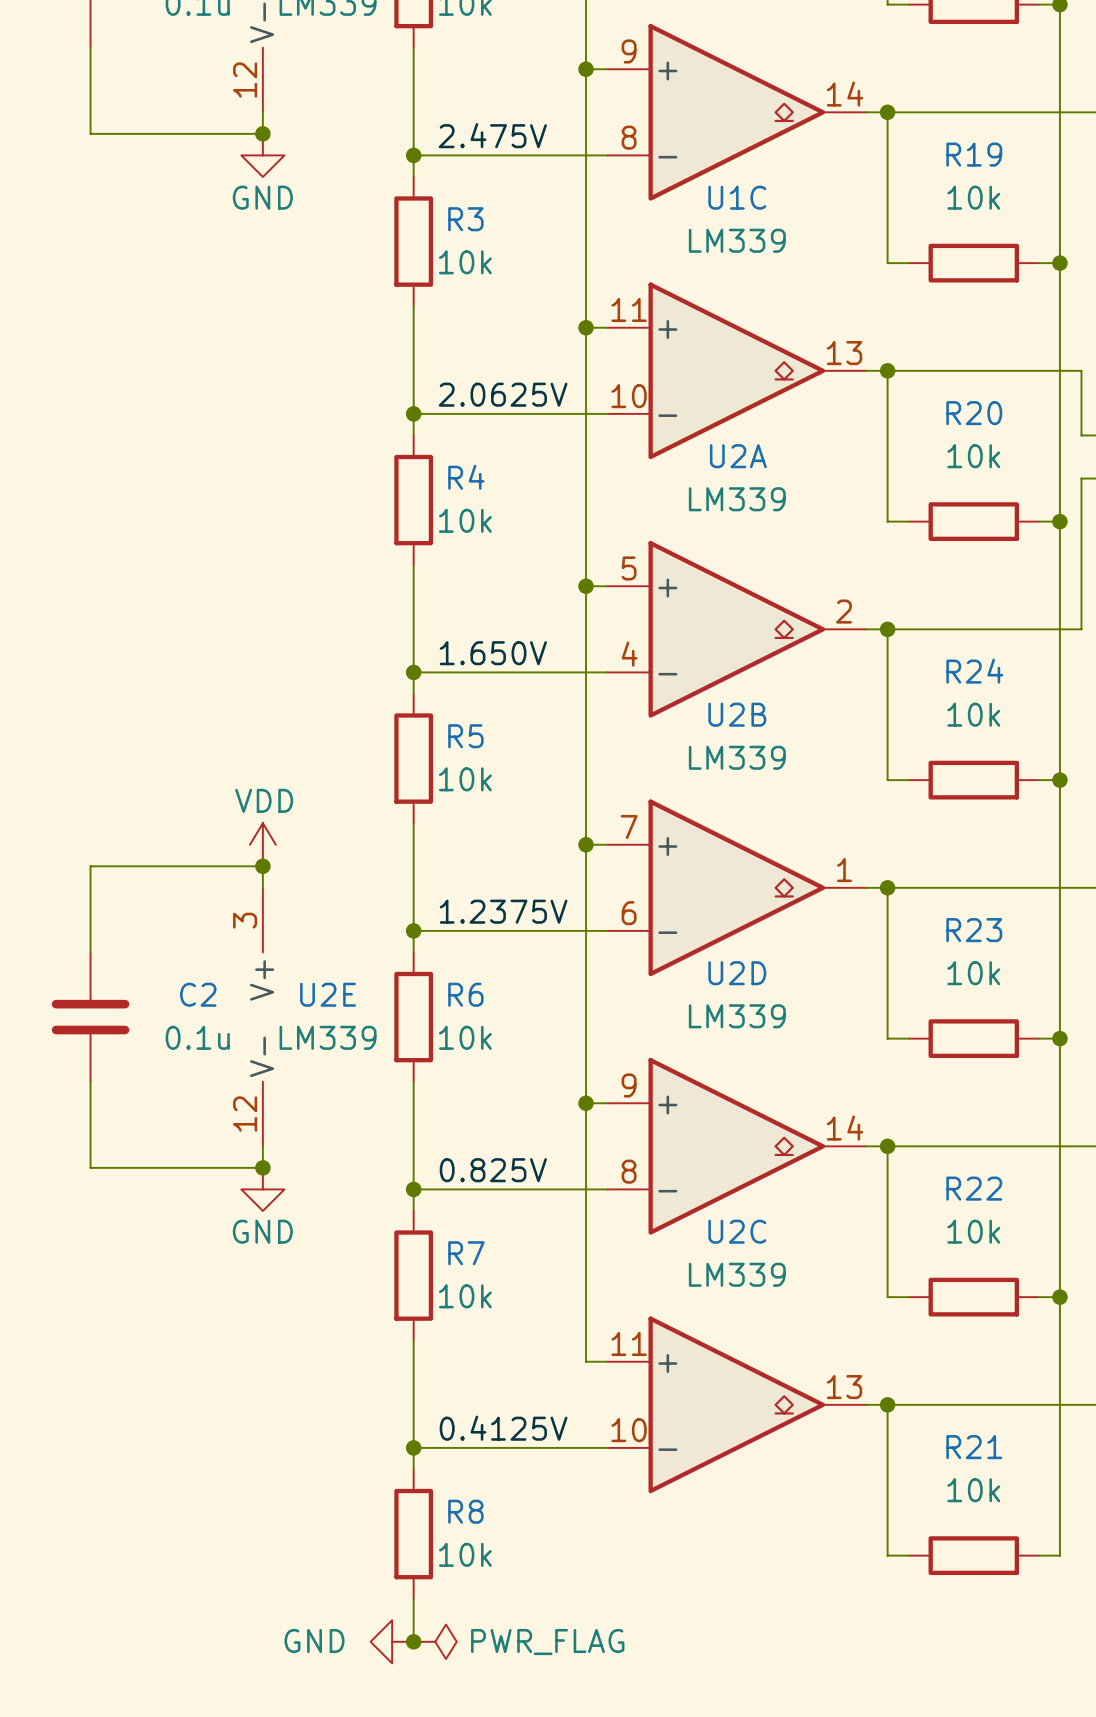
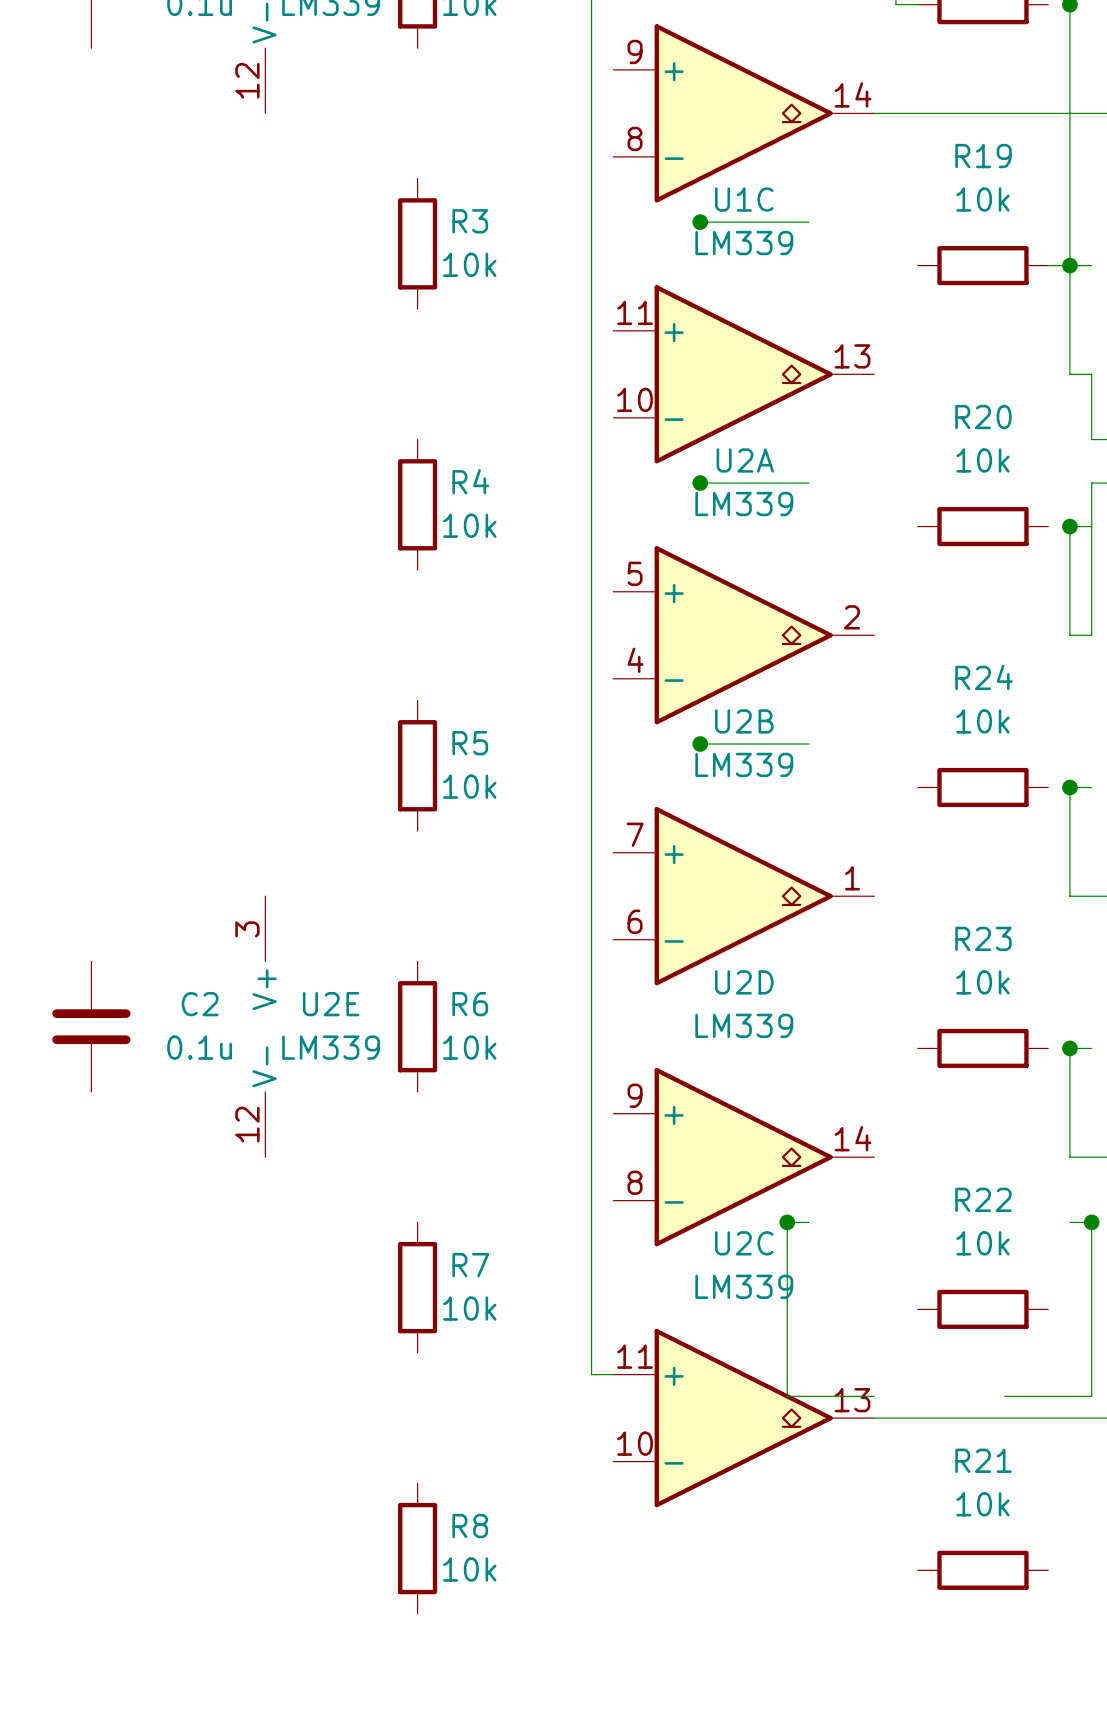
wire: (1038, 4) (1059, 4) -> (1069, 265) (1091, 265)
wire: (90, 47) (90, 133) (262, 133) (262, 112) -> none
wire: (413, 47) (413, 176) -> none
wire: (586, 69) (607, 69) -> none
junction: (586, 69) -> none
wire: (887, 112) (887, 263) (909, 263) -> none
junction: (887, 112) -> none
junction: (262, 133) -> none
label: 2.475V (492, 135) -> none
power symbol: GND (262, 155) -> none
wire: (413, 155) (607, 155) -> none
junction: (413, 155) -> none
wire: none -> (700, 222) (809, 222)
junction: none -> (700, 222)
wire: (413, 306) (413, 435) -> none
wire: (586, 327) (607, 327) -> none
junction: (586, 327) -> none
wire: (866, 370) (1059, 370) (1059, 521) (1038, 521) -> none
wire: (887, 370) (887, 521) (909, 521) -> none
junction: (887, 370) -> none
label: 2.0625V (503, 394) -> none
wire: (413, 413) (607, 413) -> none
junction: (413, 413) -> none
wire: none -> (700, 483) (809, 483)
junction: none -> (700, 483)
wire: none -> (1069, 526) (1091, 526)
wire: (413, 564) (413, 693) -> none
wire: (586, 586) (607, 586) -> none
junction: (586, 586) -> none
wire: (866, 629) (1059, 629) (1059, 780) (1038, 780) -> none
wire: (887, 629) (887, 780) (909, 780) -> none
junction: (887, 629) -> none
label: 1.650V (493, 653) -> none
wire: (413, 672) (607, 672) -> none
junction: (413, 672) -> none
wire: none -> (700, 744) (809, 744)
junction: none -> (700, 744)
wire: none -> (1069, 787) (1091, 787)
wire: (413, 823) (413, 952) -> none
power symbol: VDD (262, 844) -> none
wire: (586, 844) (607, 844) -> none
junction: (586, 844) -> none
junction: (262, 866) -> none
wire: (262, 887) (262, 866) (90, 866) (90, 952) -> none
wire: (866, 887) (1059, 887) (1059, 1038) (1038, 1038) -> none
wire: (887, 887) (887, 1038) (909, 1038) -> none
junction: (887, 887) -> none
label: 1.2375V (503, 911) -> none
wire: (413, 930) (607, 930) -> none
junction: (413, 930) -> none
wire: (90, 1081) (90, 1167) (262, 1167) (262, 1146) -> none
wire: (413, 1081) (413, 1210) -> none
wire: (586, 1103) (607, 1103) -> none
junction: (586, 1103) -> none
wire: (866, 1146) (1059, 1146) (1059, 1555) (1038, 1555) -> none
wire: (887, 1146) (887, 1297) (909, 1297) -> none
junction: (887, 1146) -> none
junction: (262, 1167) -> none
label: 0.825V (493, 1170) -> none
power symbol: GND (262, 1189) -> none
wire: (413, 1189) (607, 1189) -> none
junction: (413, 1189) -> none
junction: none -> (787, 1222)
wire: none -> (809, 1222) (787, 1222) (787, 1396) (874, 1396)
wire: none -> (1069, 1222) (1091, 1222) (1091, 1396) (1004, 1396)
wire: (1038, 1297) (1059, 1297) -> (1069, 1048) (1091, 1048)
junction position: (1059, 1297) -> (1091, 1222)
wire: (413, 1340) (413, 1469) -> none
wire: (887, 1404) (887, 1555) (909, 1555) -> none
junction: (887, 1404) -> none
label: 0.4125V (503, 1428) -> none
wire: (413, 1447) (607, 1447) -> none
junction: (413, 1447) -> none
wire: (413, 1598) (413, 1641) -> none
power symbol: GND (392, 1641) -> none
junction: (413, 1641) -> none
power symbol: PWR_FLAG (435, 1641) -> none

